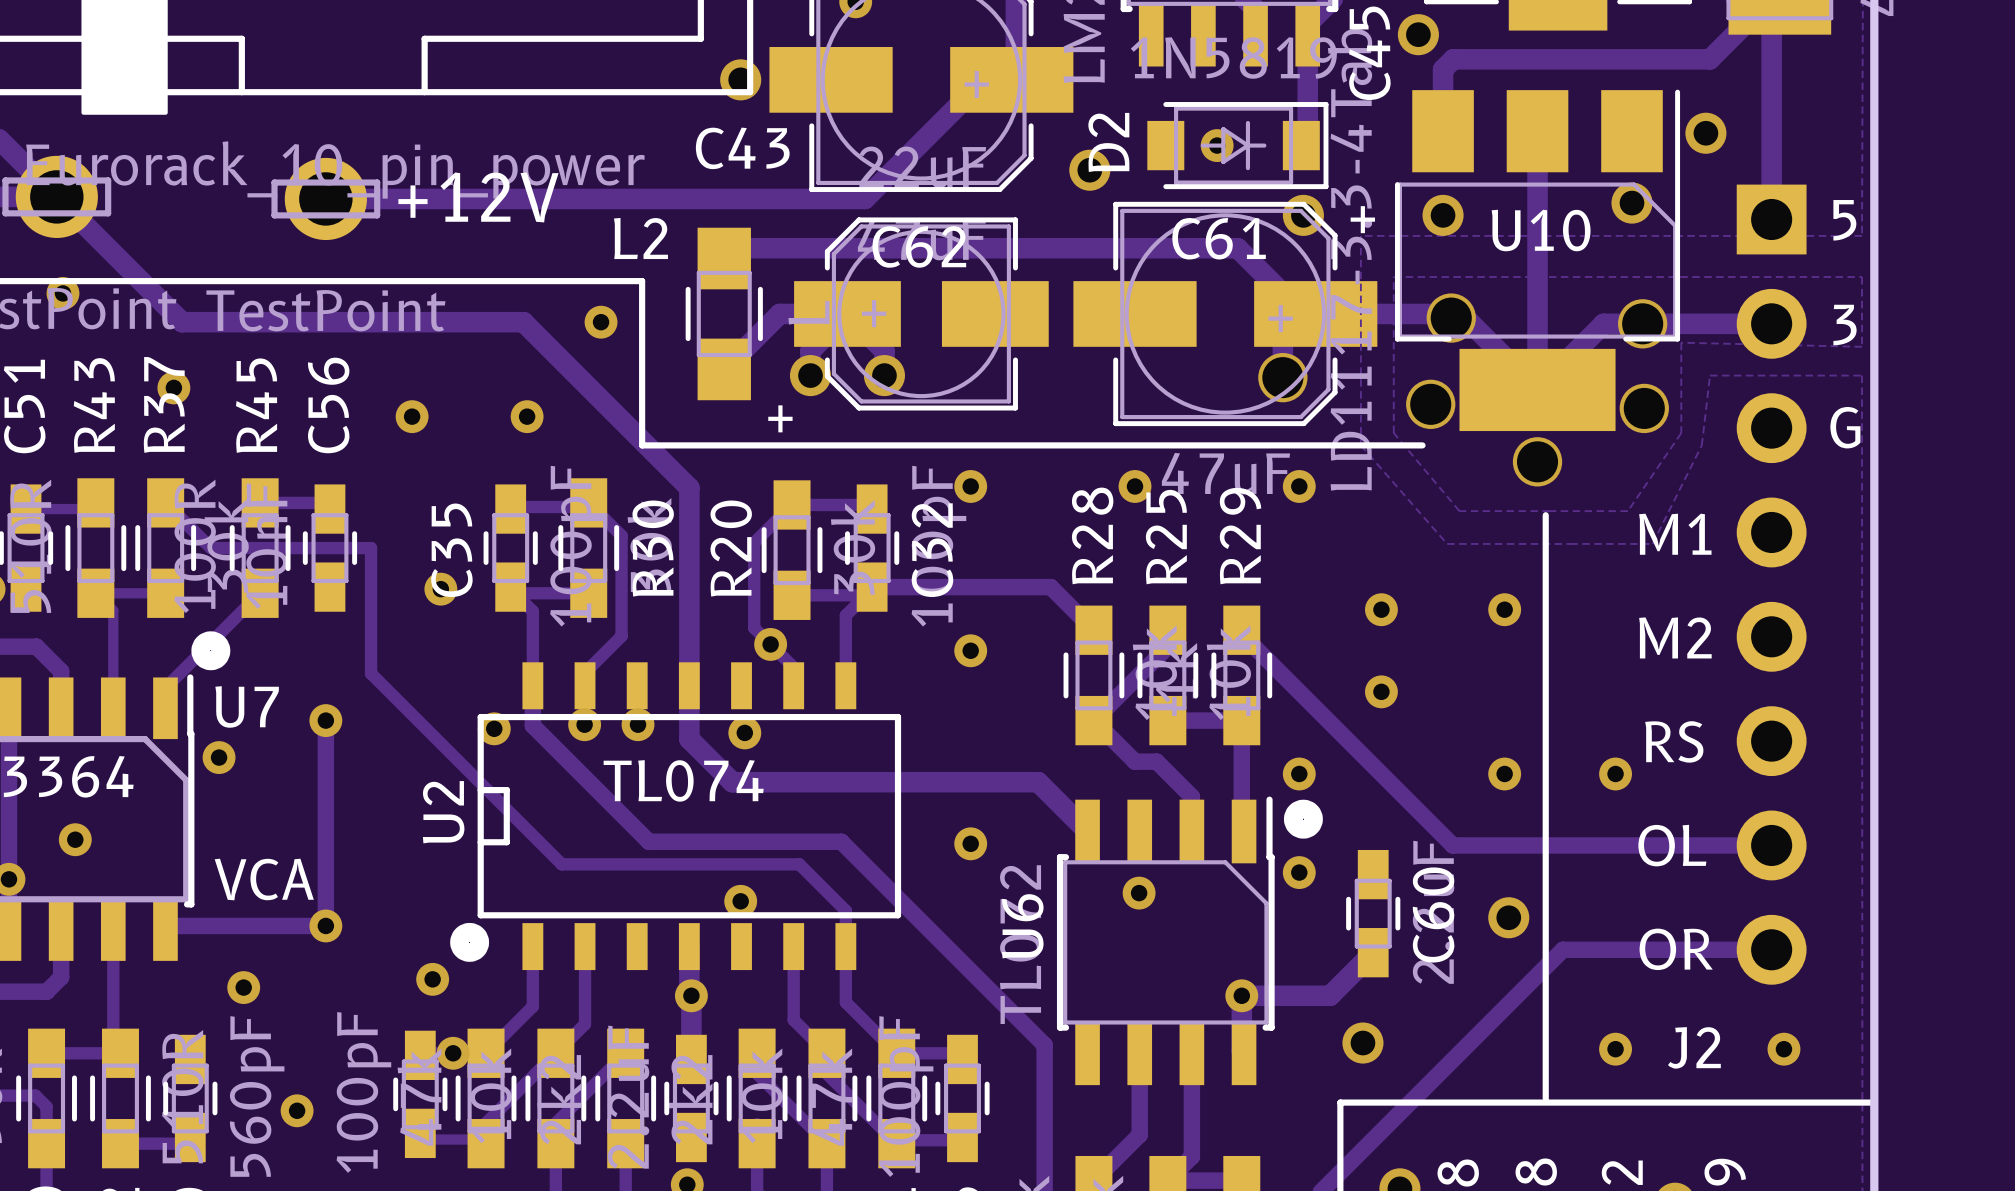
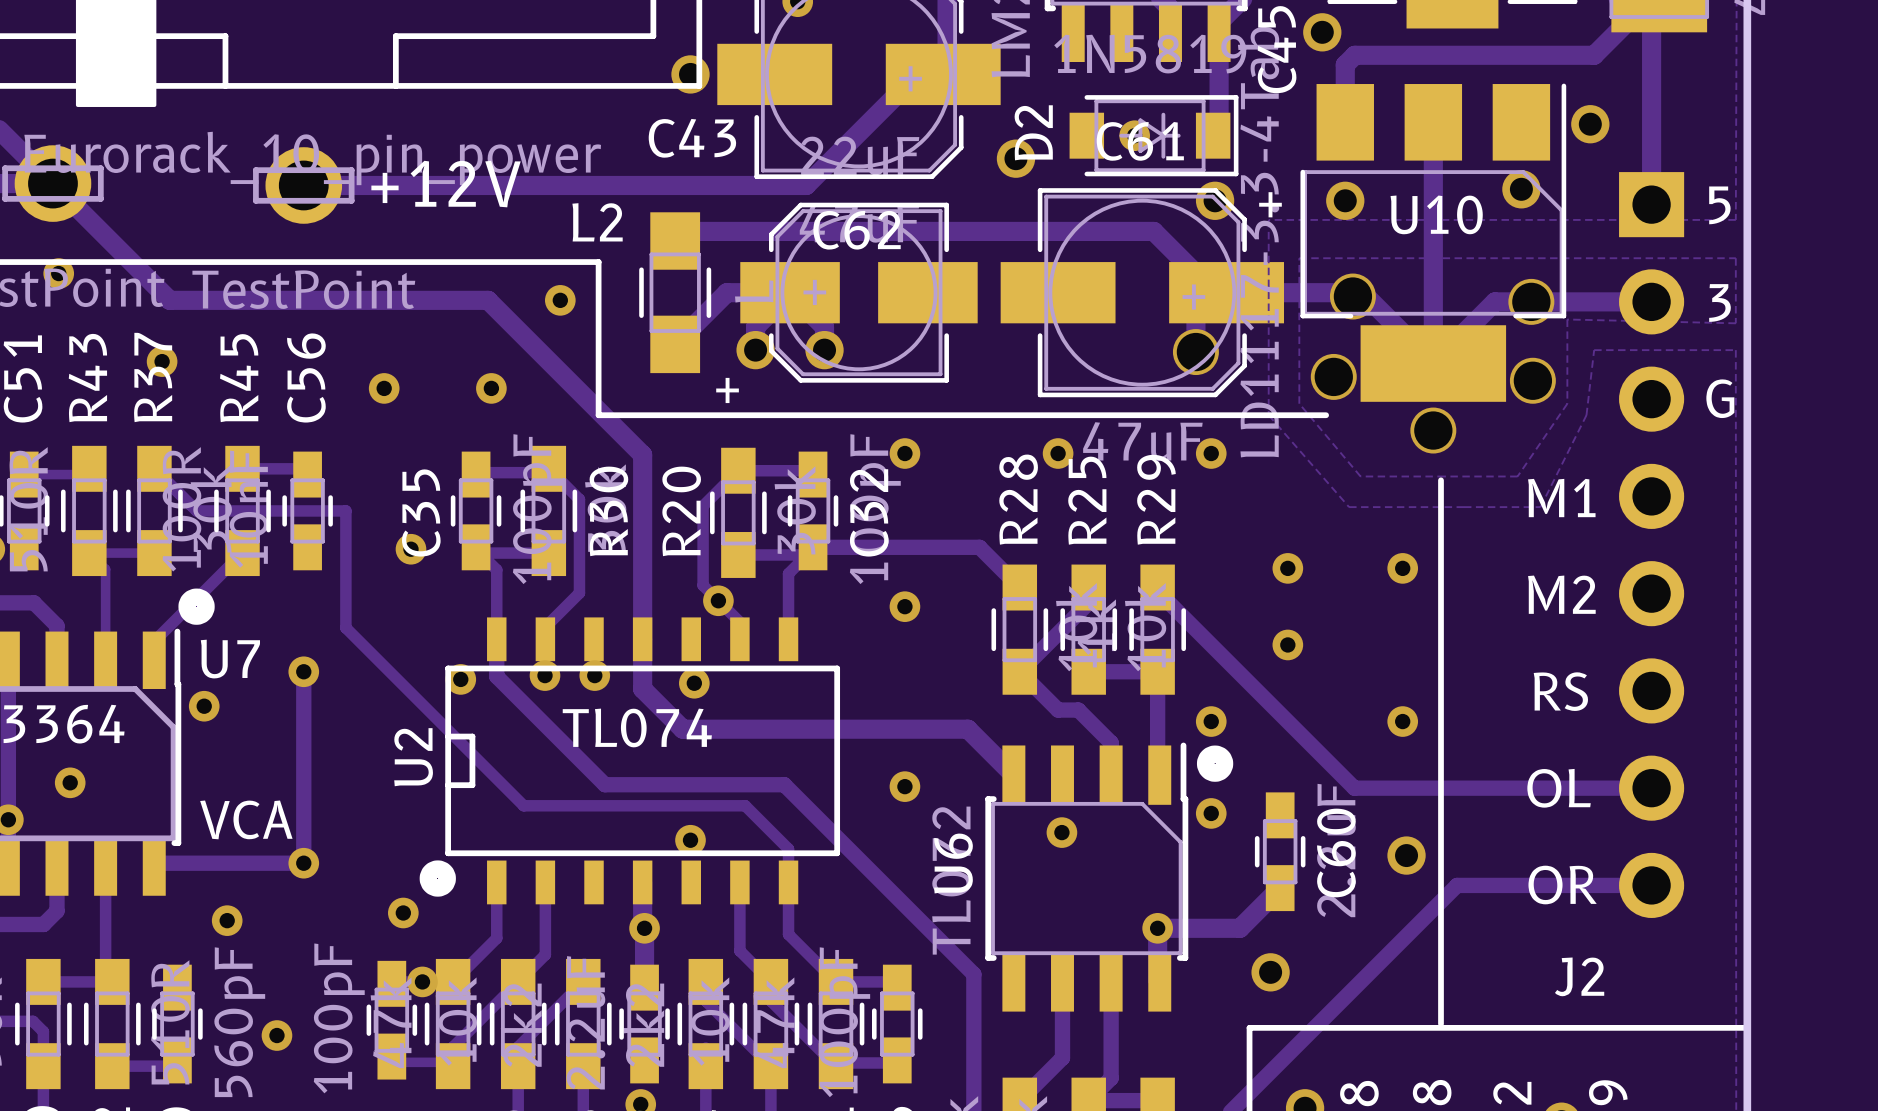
C61 name position: C61 (1219, 238) -> C61 (1140, 141)
via: (1615, 773) -> none
via: (1615, 1049) -> none
via: (1783, 1049) -> none

